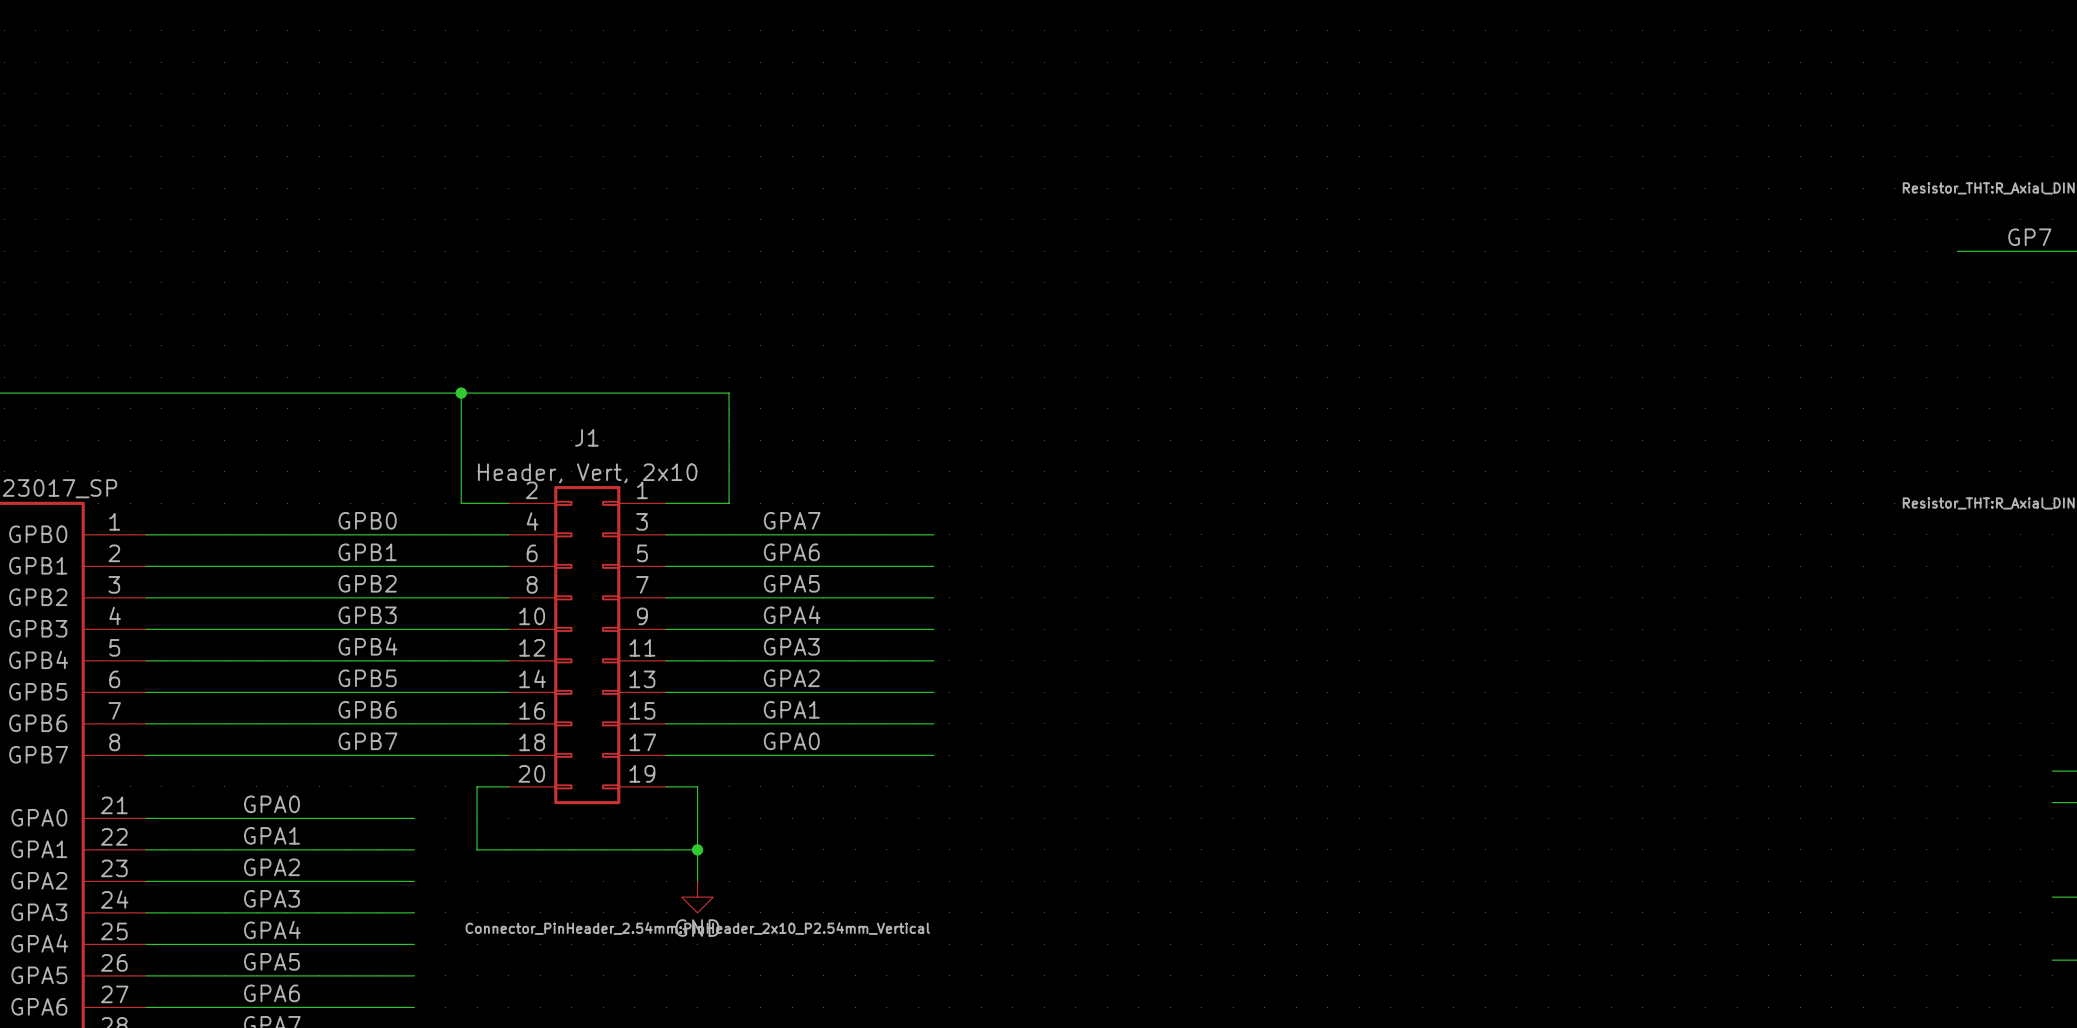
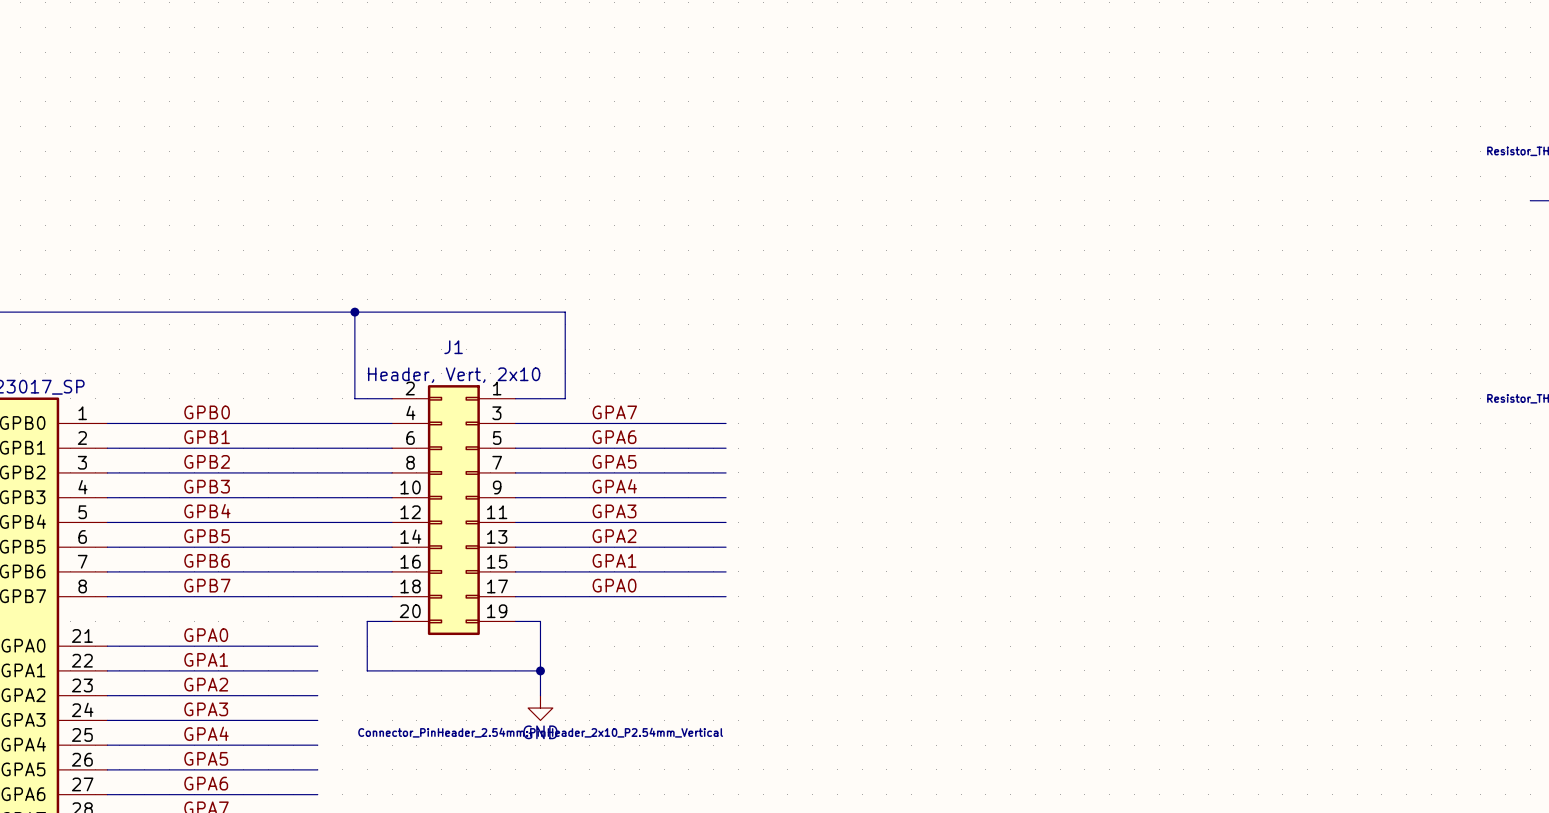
label position: GPB0 (367, 520) -> GPB0 (207, 412)
label position: GPB1 (367, 552) -> GPB1 (207, 437)
label position: GPB2 (367, 583) -> GPB2 (207, 461)
label position: GPB3 (367, 615) -> GPB3 (207, 486)
label position: GPB4 (367, 646) -> GPB4 (207, 511)
label position: GPB5 (367, 678) -> GPB5 (207, 536)
label position: GPB6 (367, 709) -> GPB6 (207, 560)
label position: GPB7 (367, 741) -> GPB7 (207, 585)

